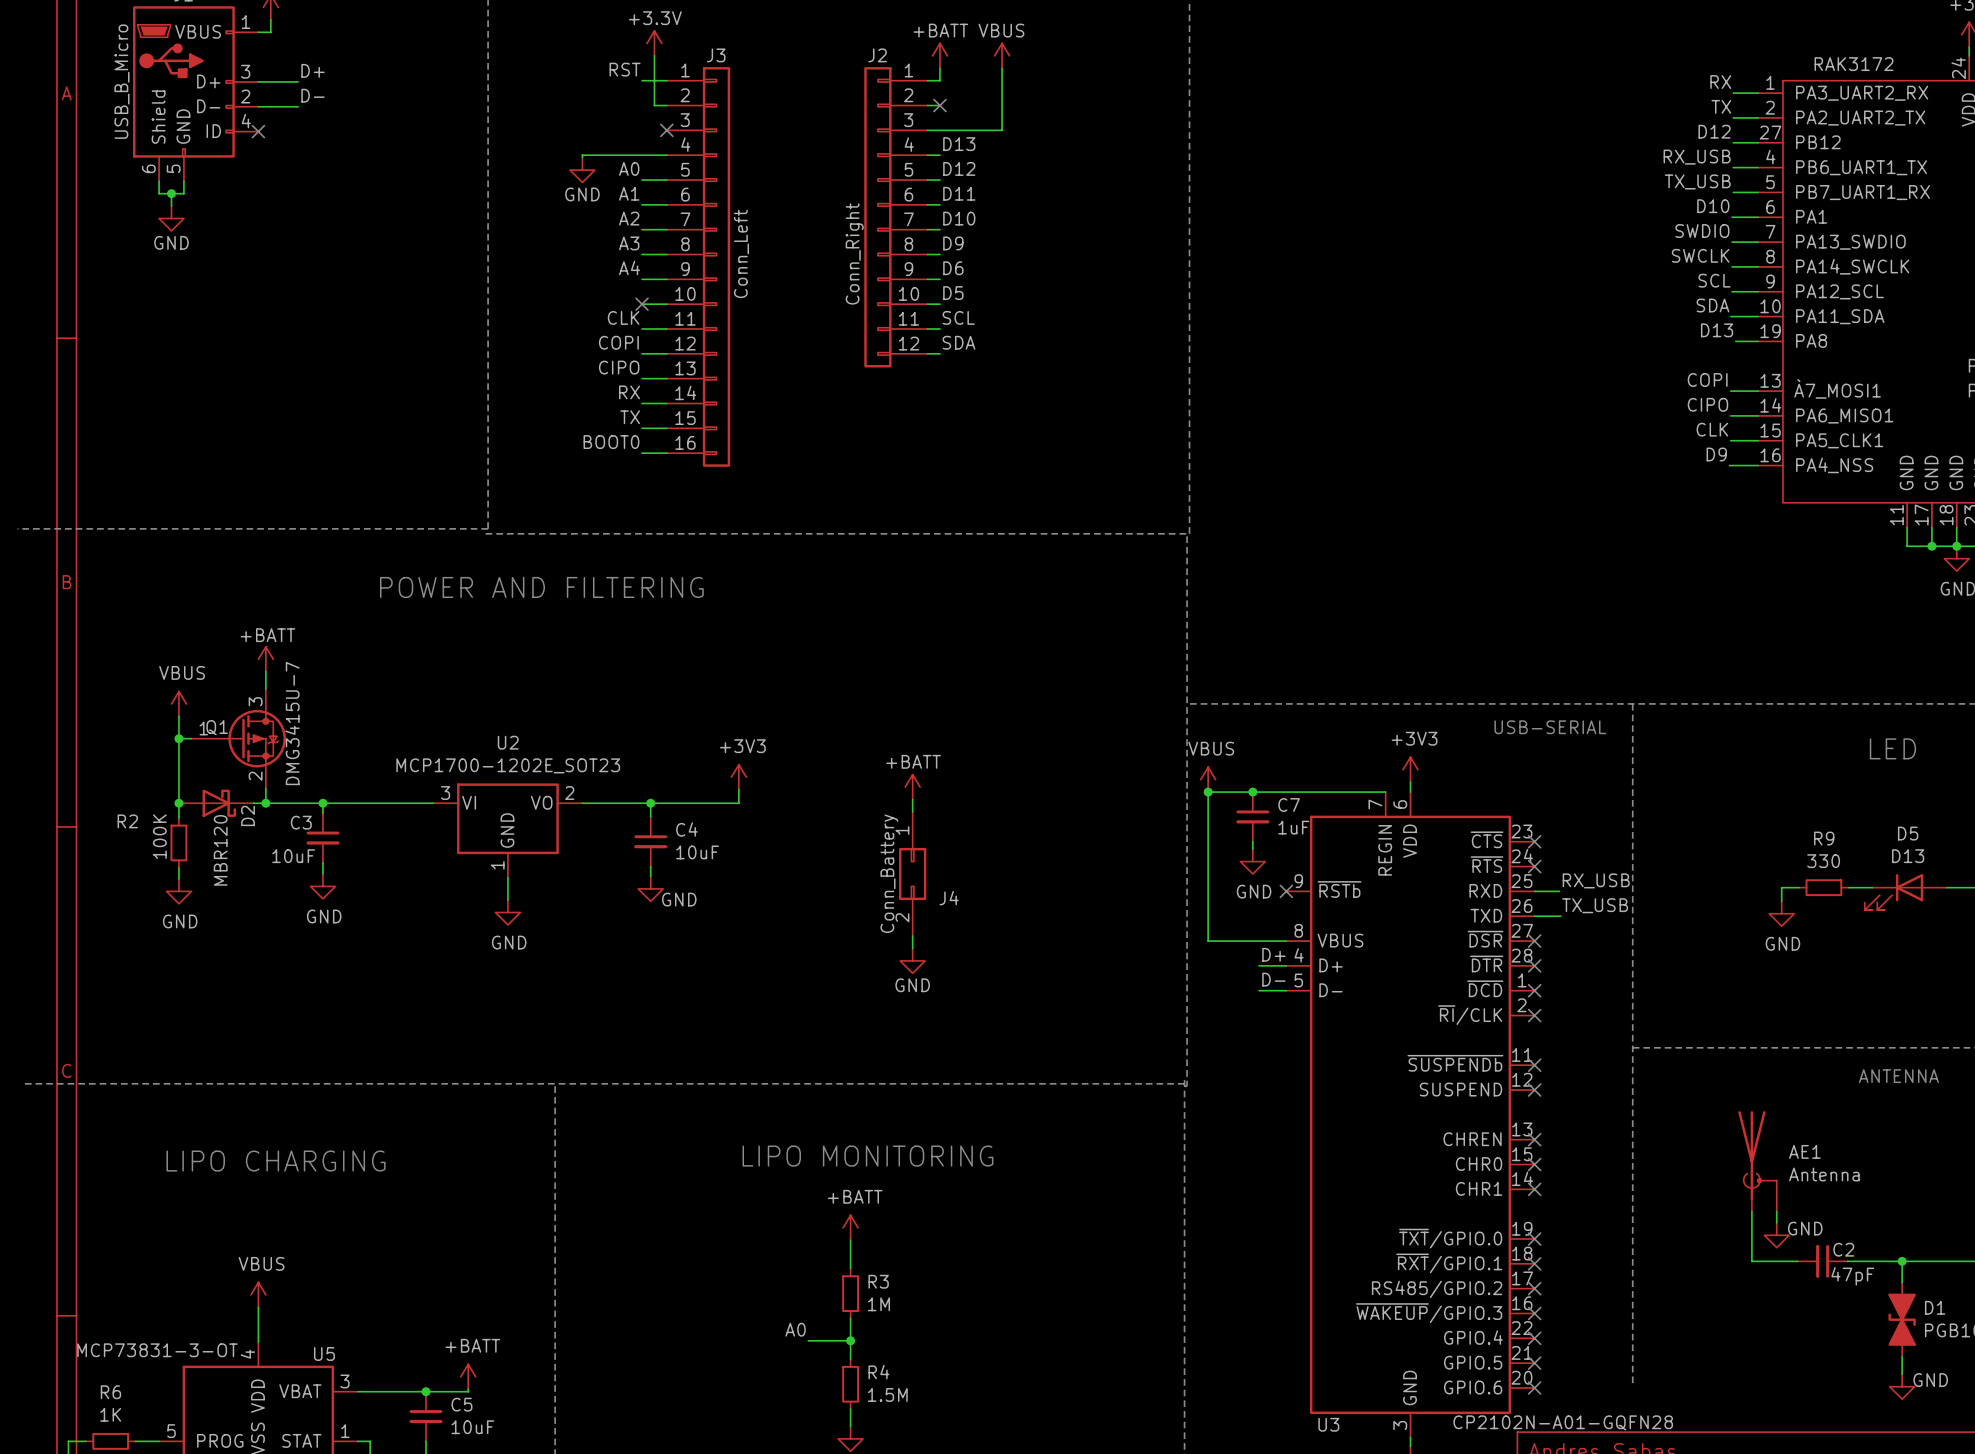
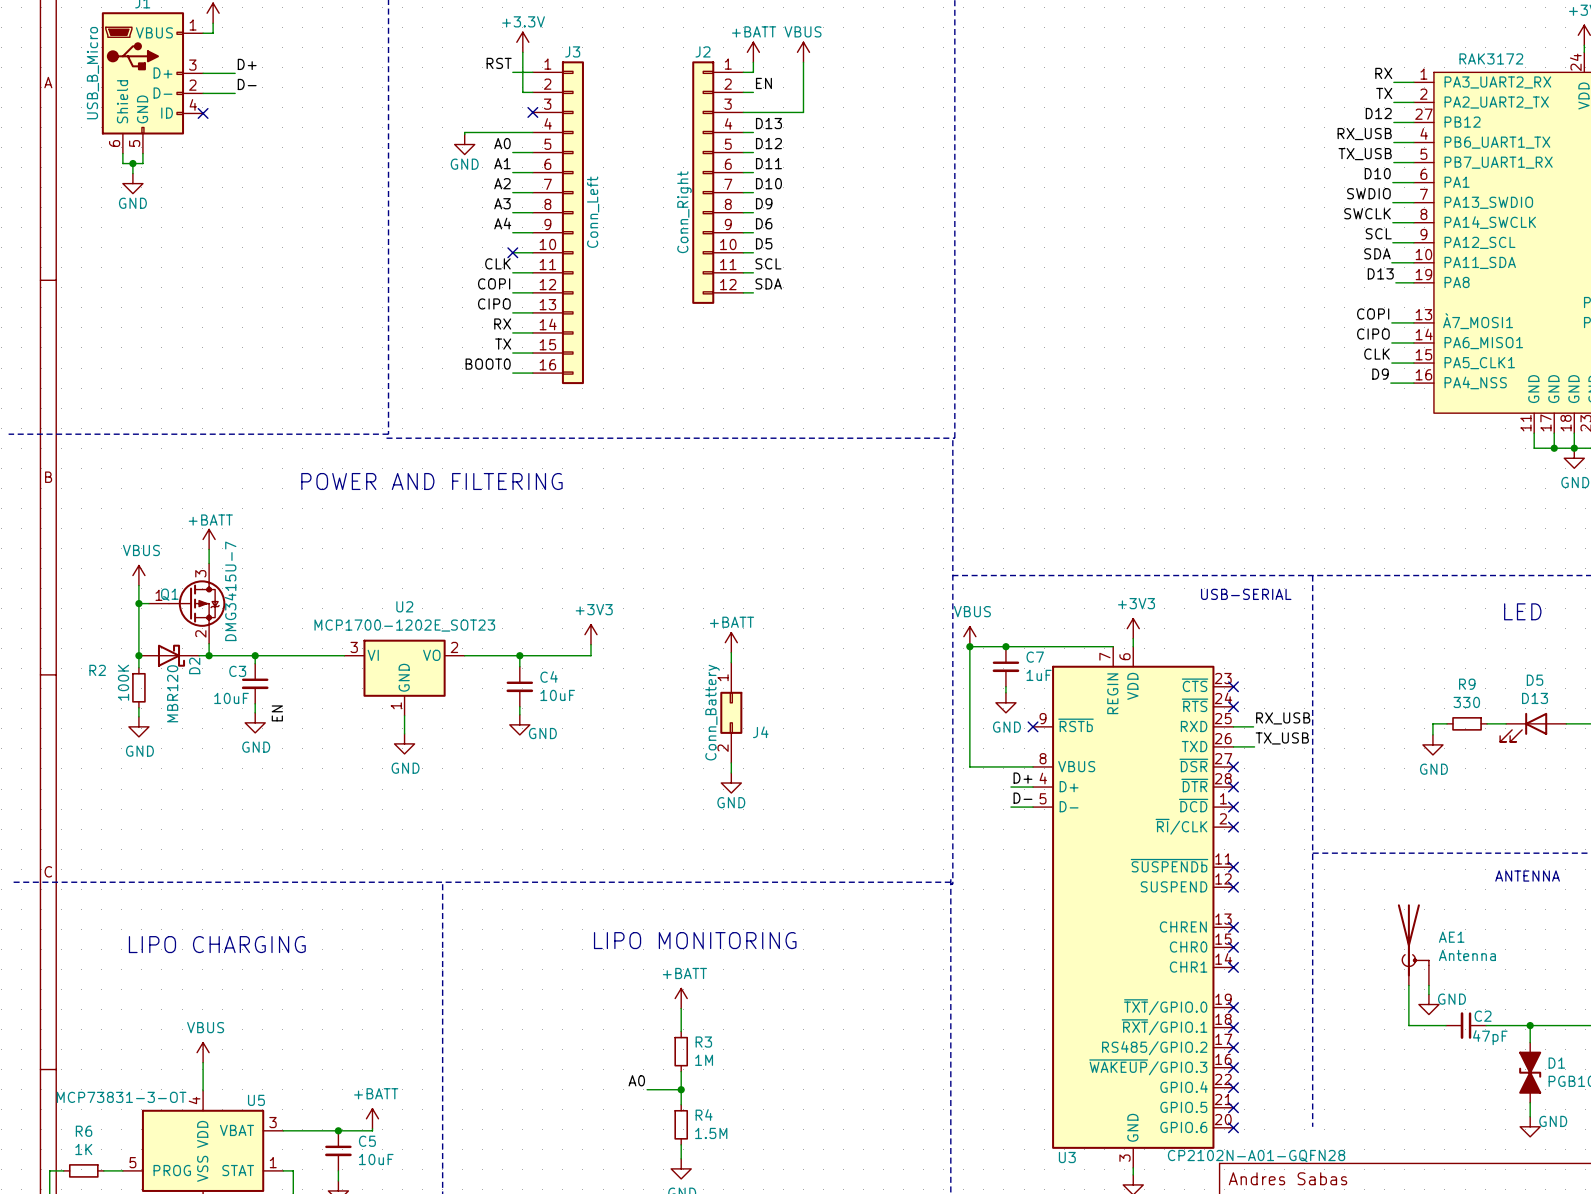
label: none -> EN (763, 83)
no-connect mark: (939, 105) -> none
label: none -> EN (277, 713)

